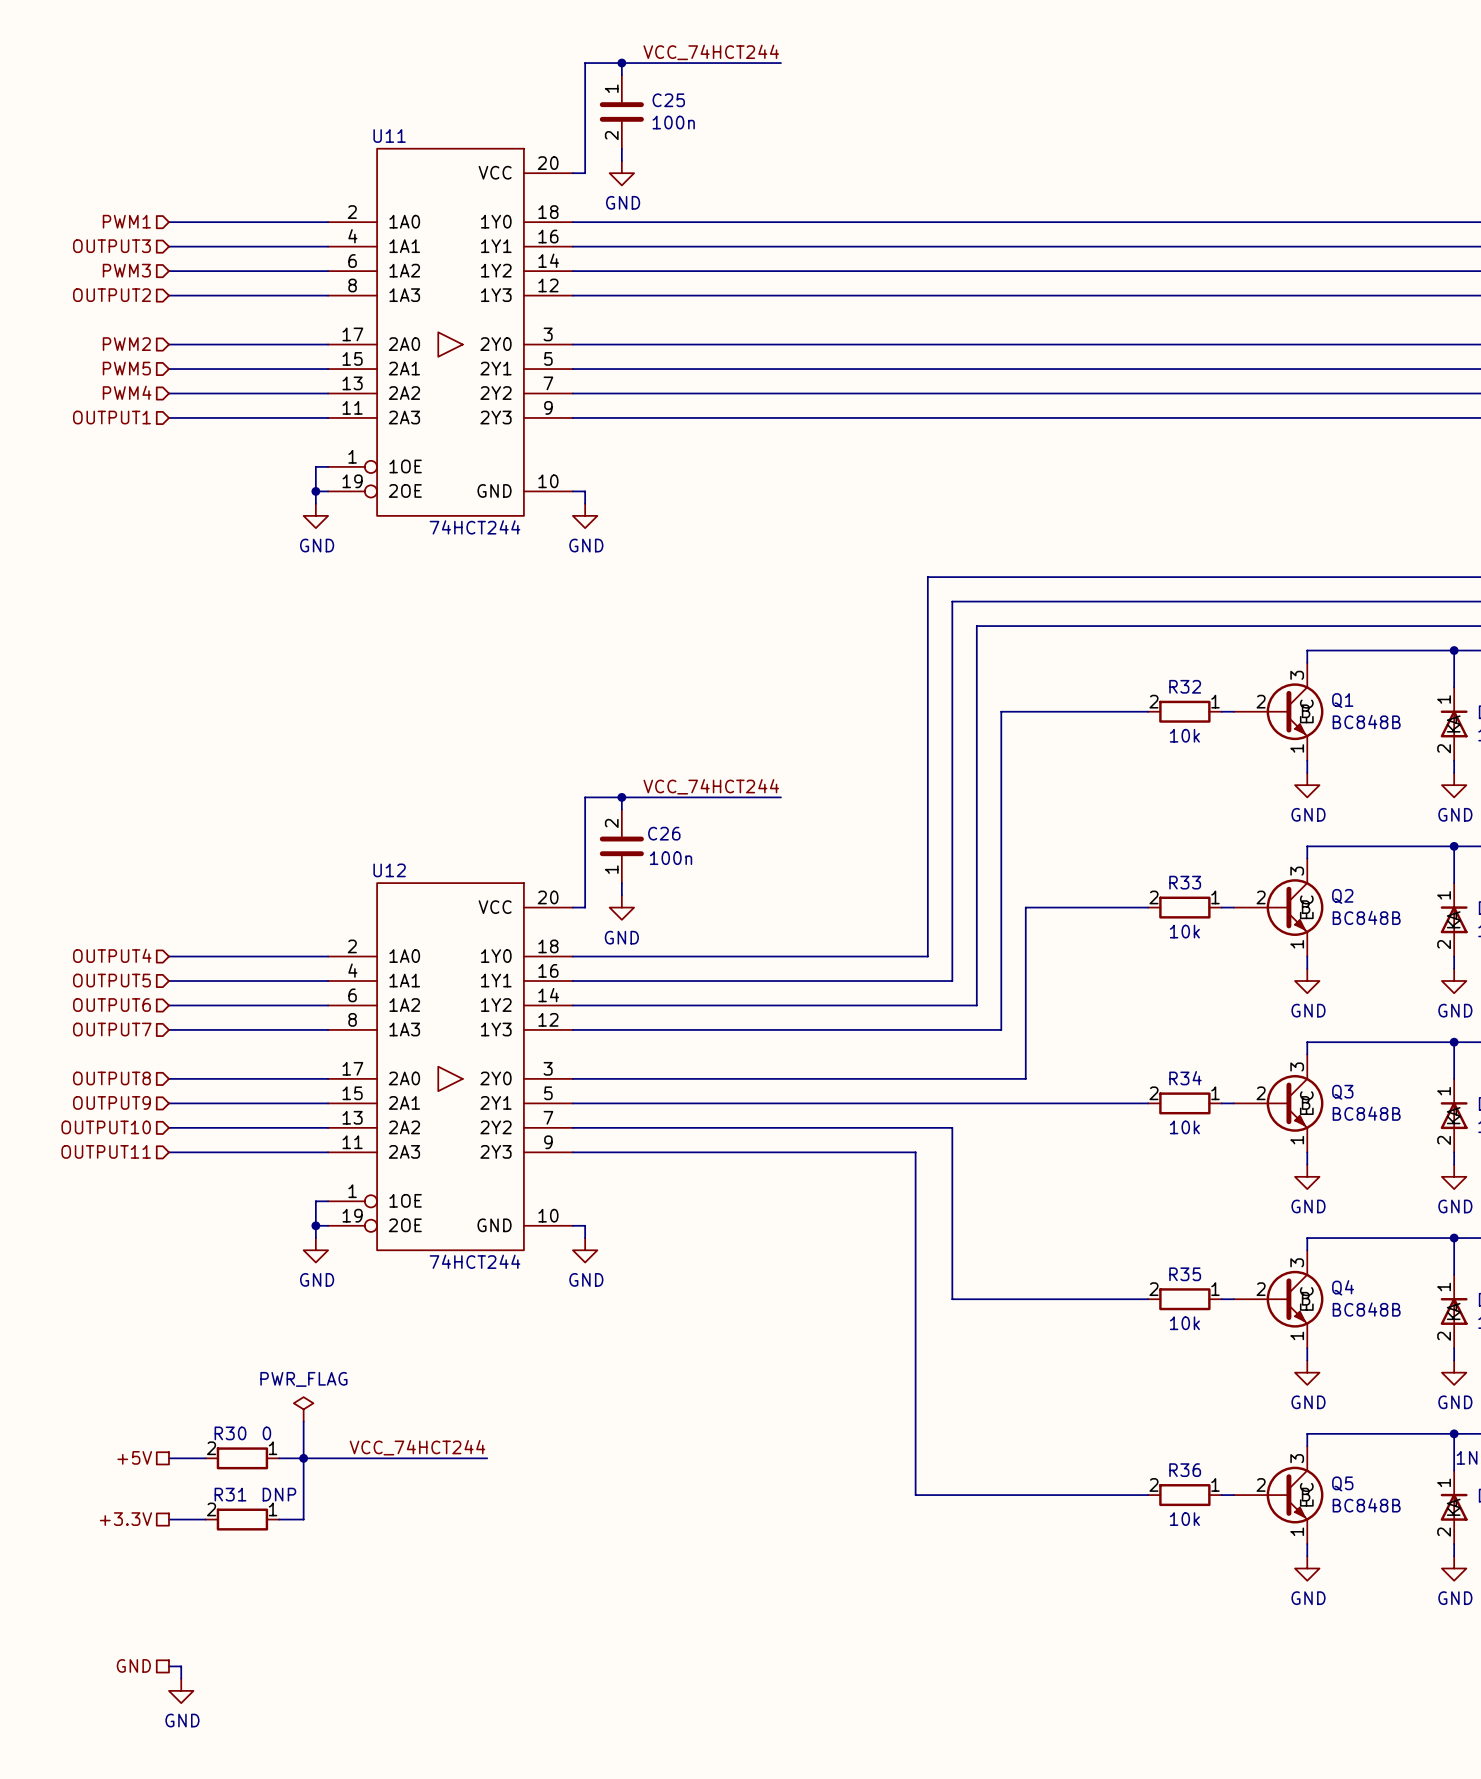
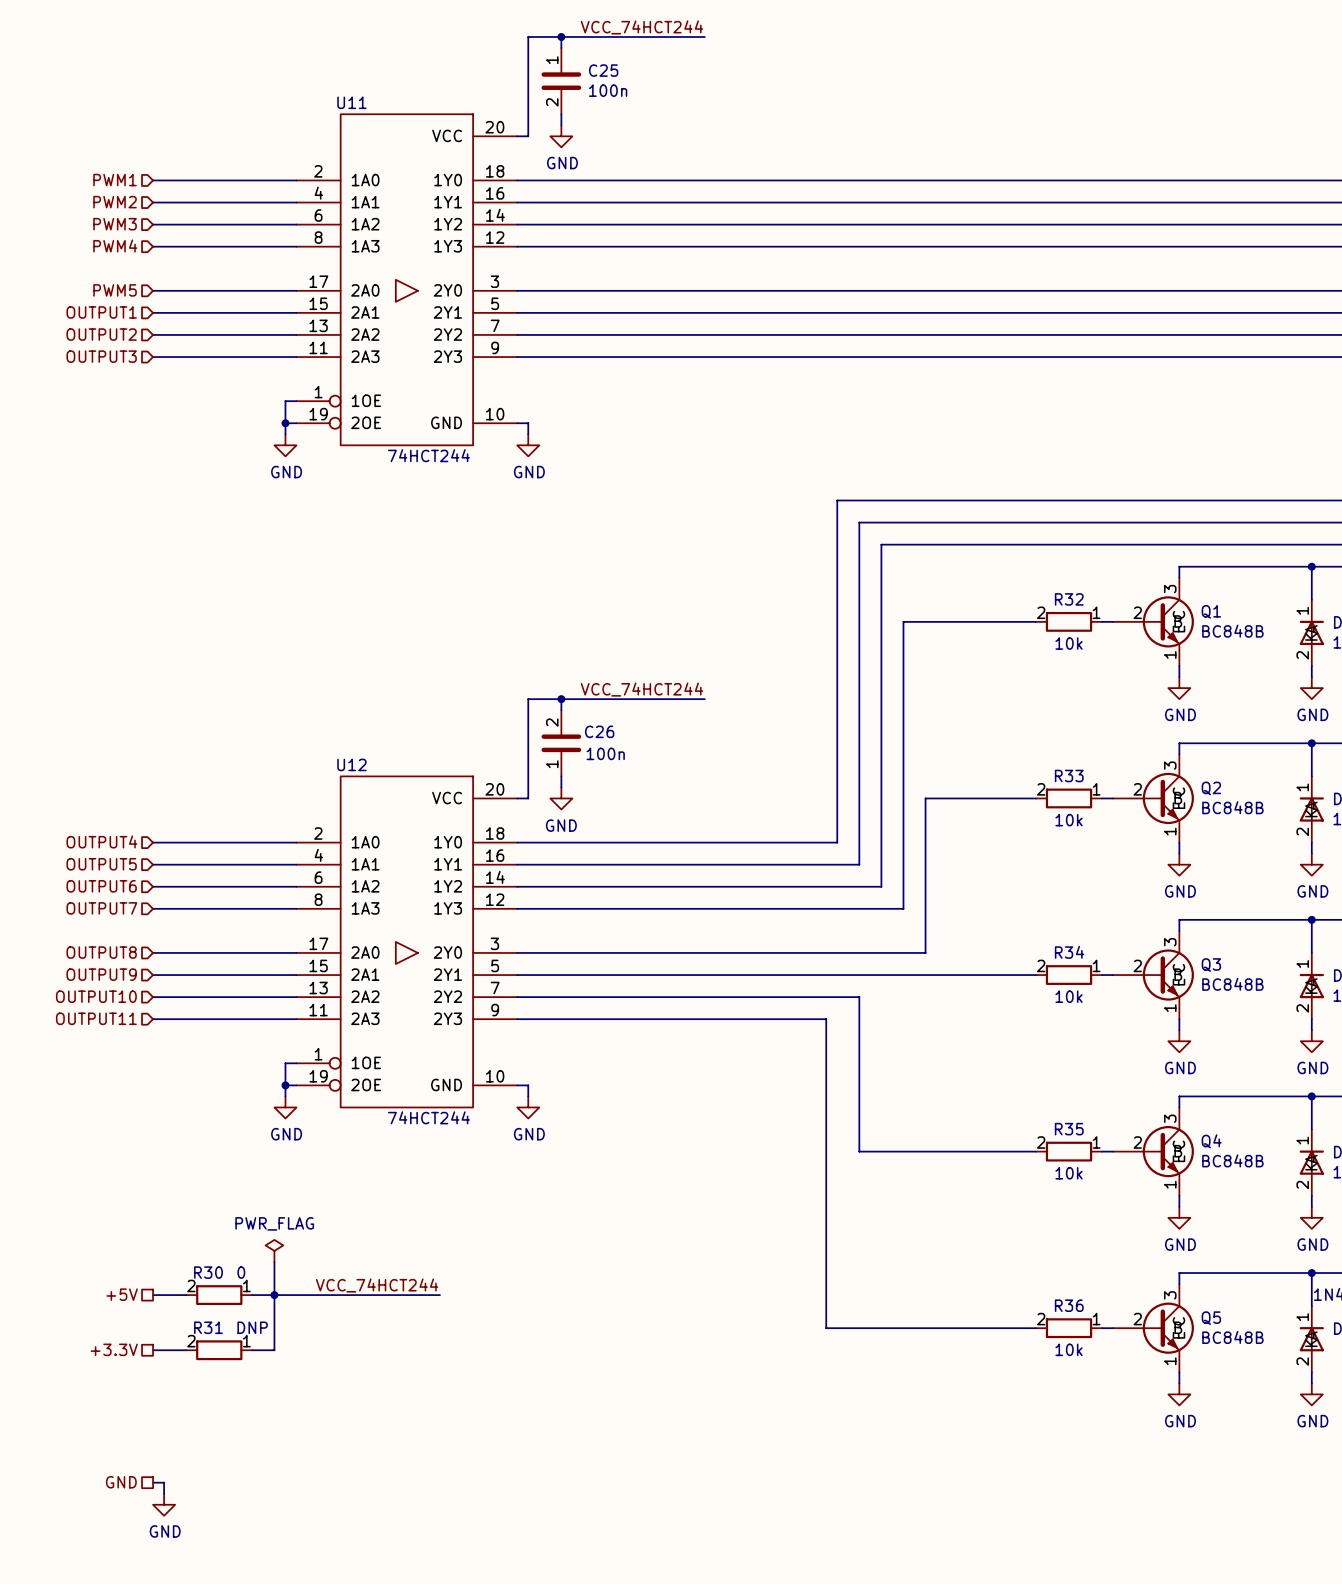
hierarchical label: OUTPUT3 (111, 246) -> PWM2 (115, 202)
hierarchical label: OUTPUT2 (111, 295) -> PWM4 (115, 246)
hierarchical label: PWM2 (126, 344) -> PWM5 (115, 290)
hierarchical label: PWM5 (126, 368) -> OUTPUT1 (101, 312)
hierarchical label: PWM4 (127, 392) -> OUTPUT2 (101, 334)
hierarchical label: OUTPUT1 (111, 417) -> OUTPUT3 (101, 356)

